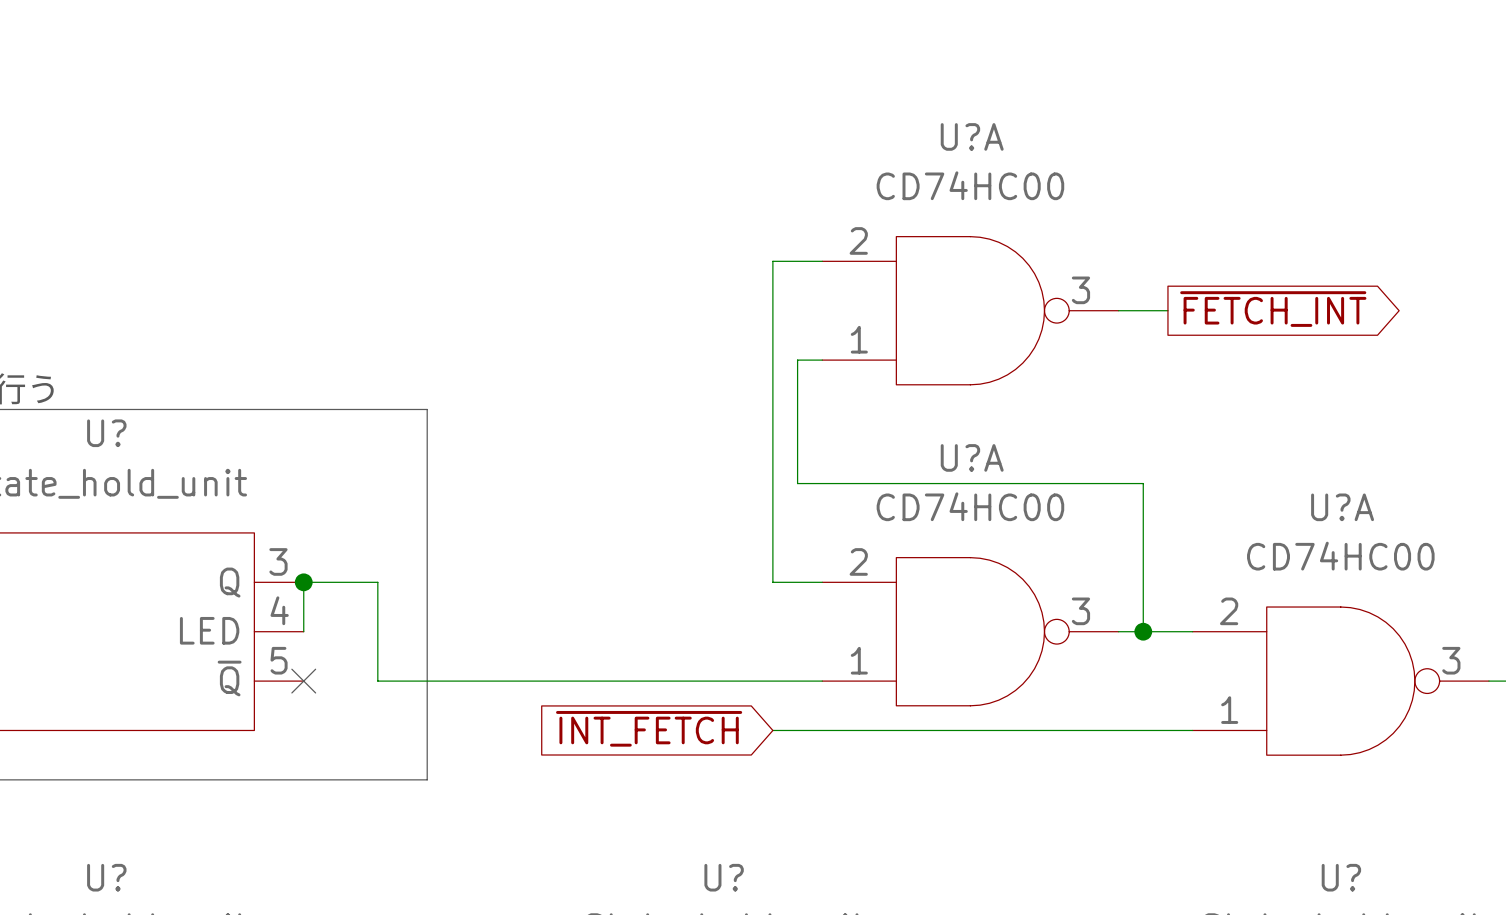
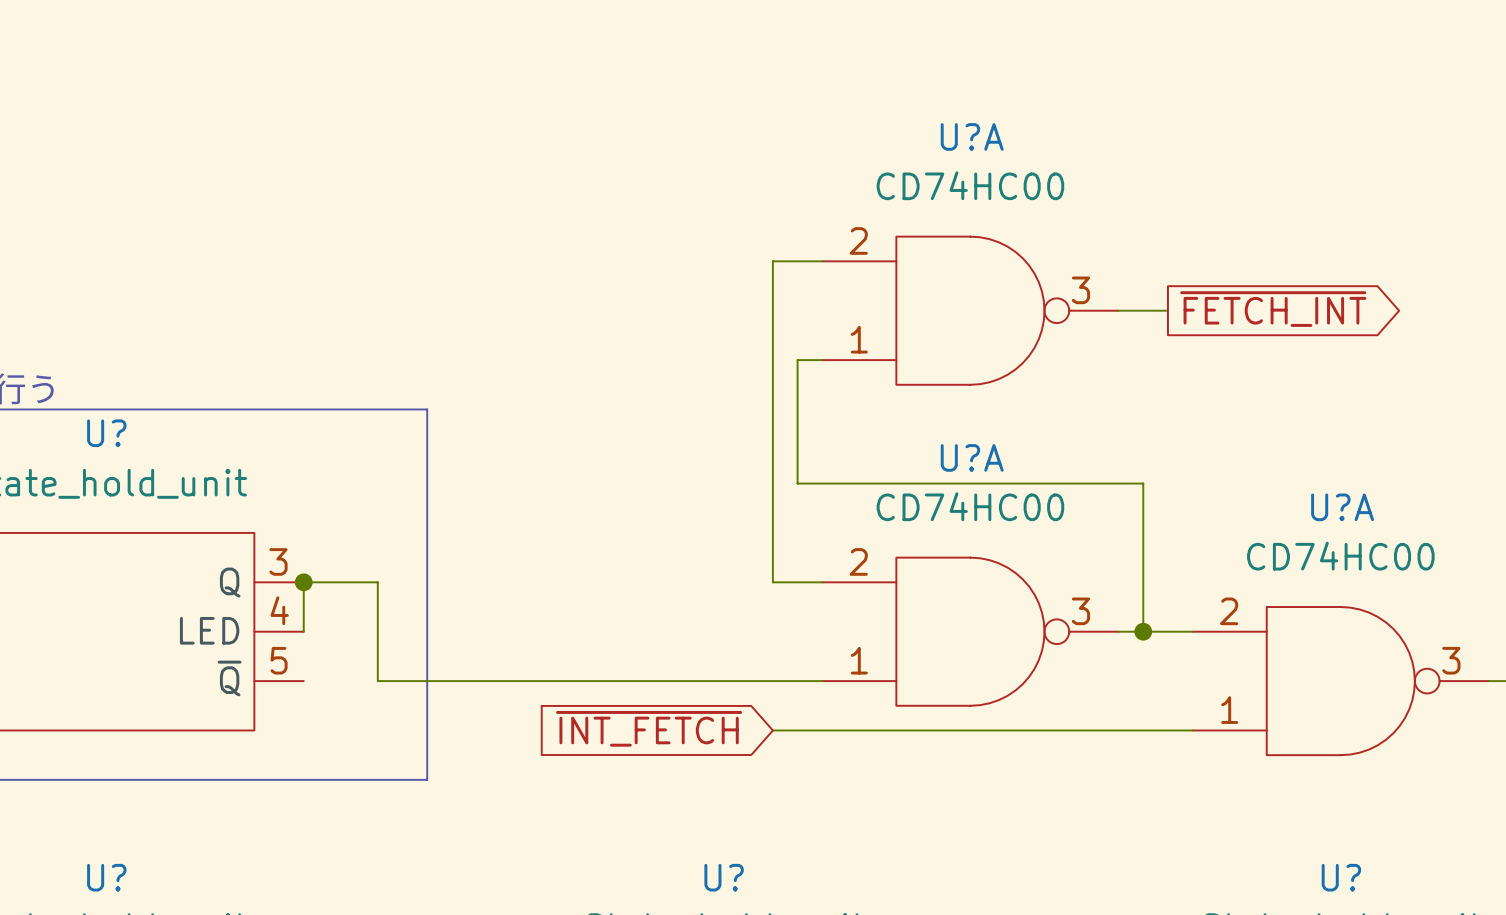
no-connect mark: (303, 681) -> none

